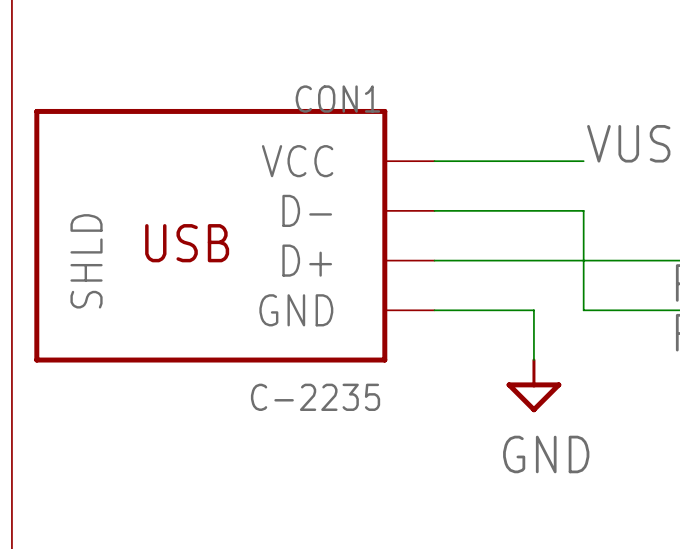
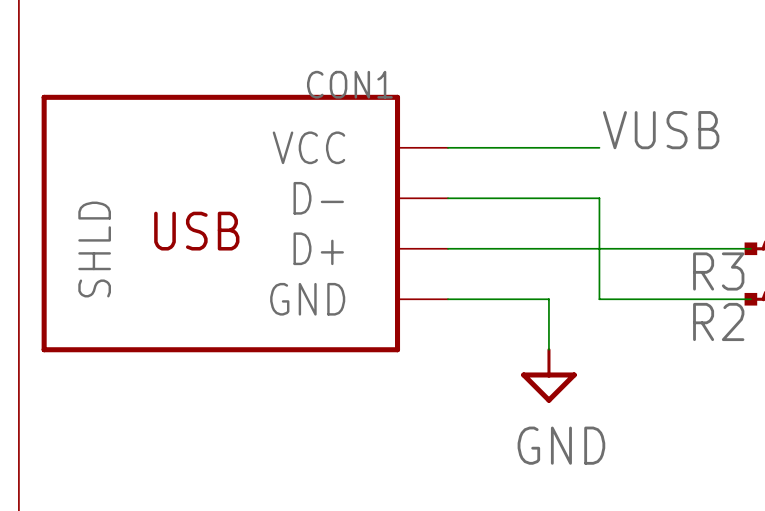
CON1 value: C-2235 (315, 397) -> none

